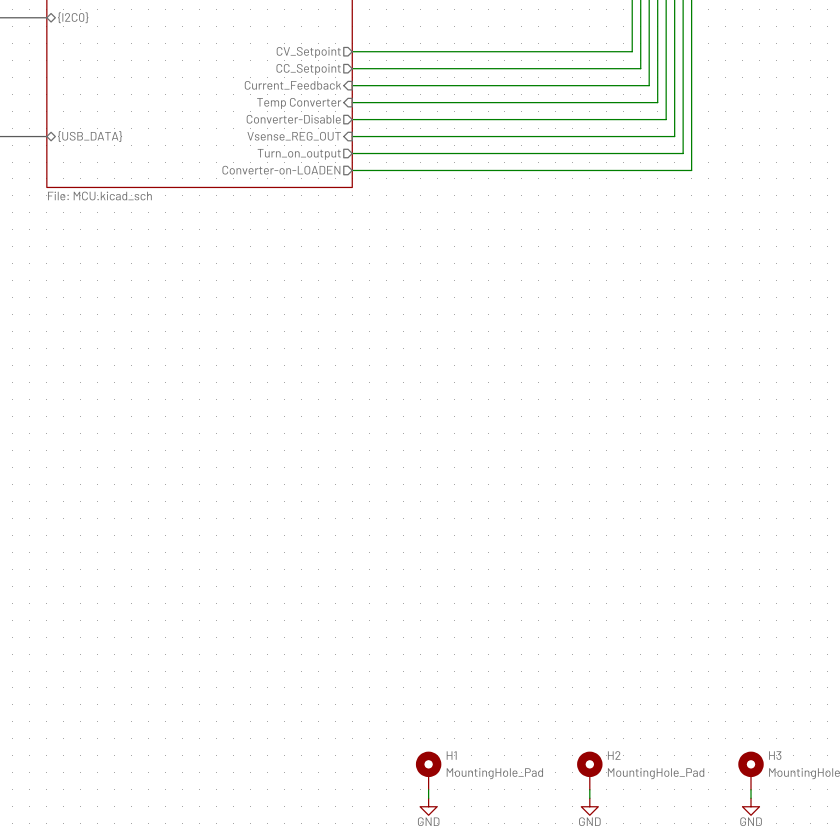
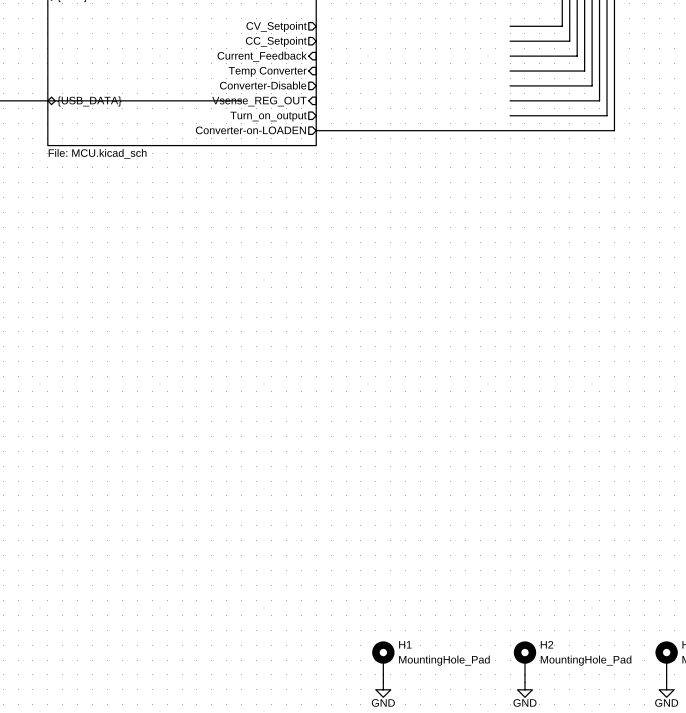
wire: (352, 51) (572, 51) -> none
wire: (352, 68) (572, 68) -> none
wire: (352, 85) (572, 85) -> none
wire: (352, 102) (572, 102) -> none
wire: (352, 119) (572, 119) -> none
bus: none -> (47, 100) (241, 100)
wire: (352, 136) (572, 136) -> none
wire: (352, 153) (572, 153) -> none

